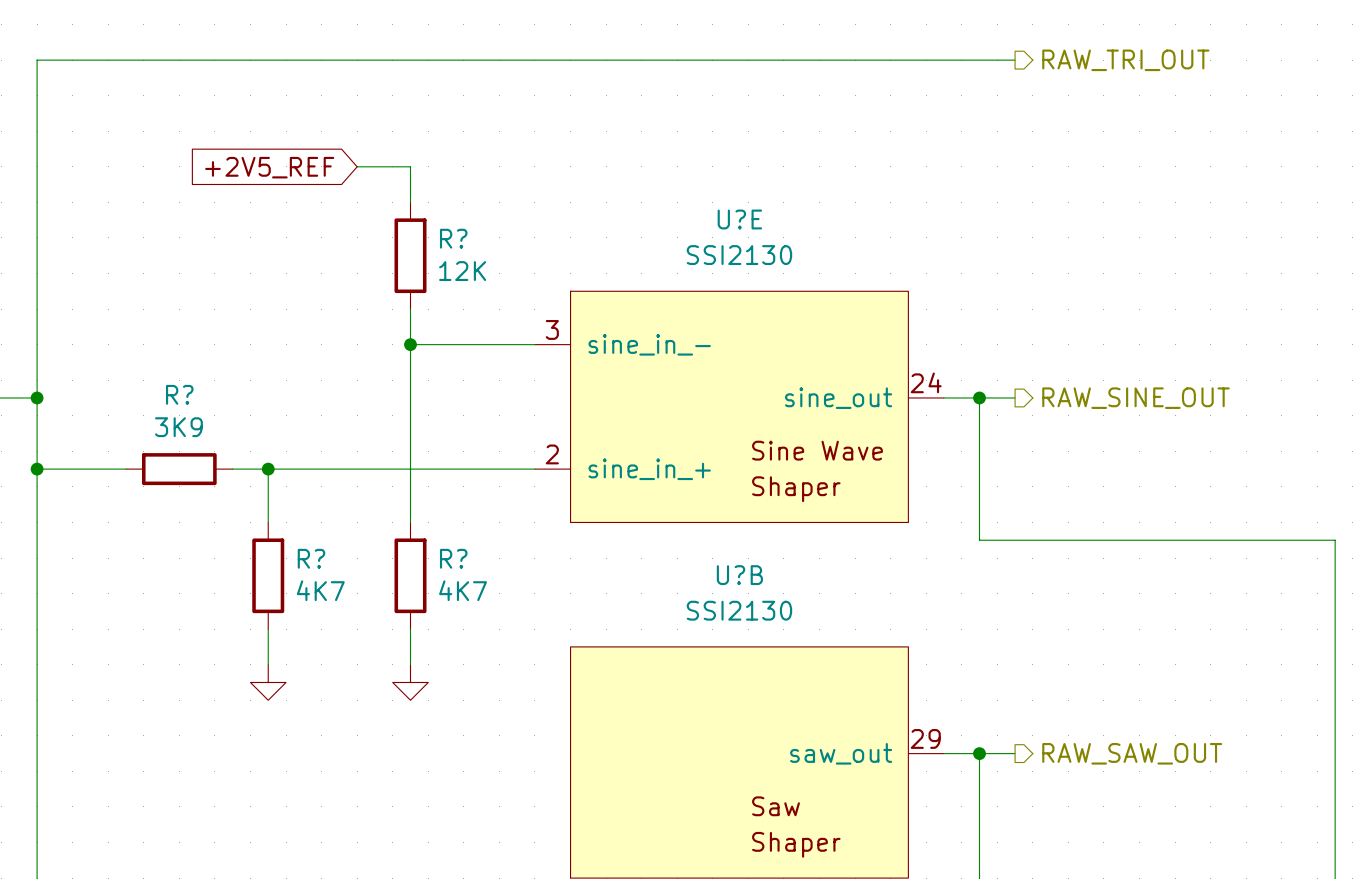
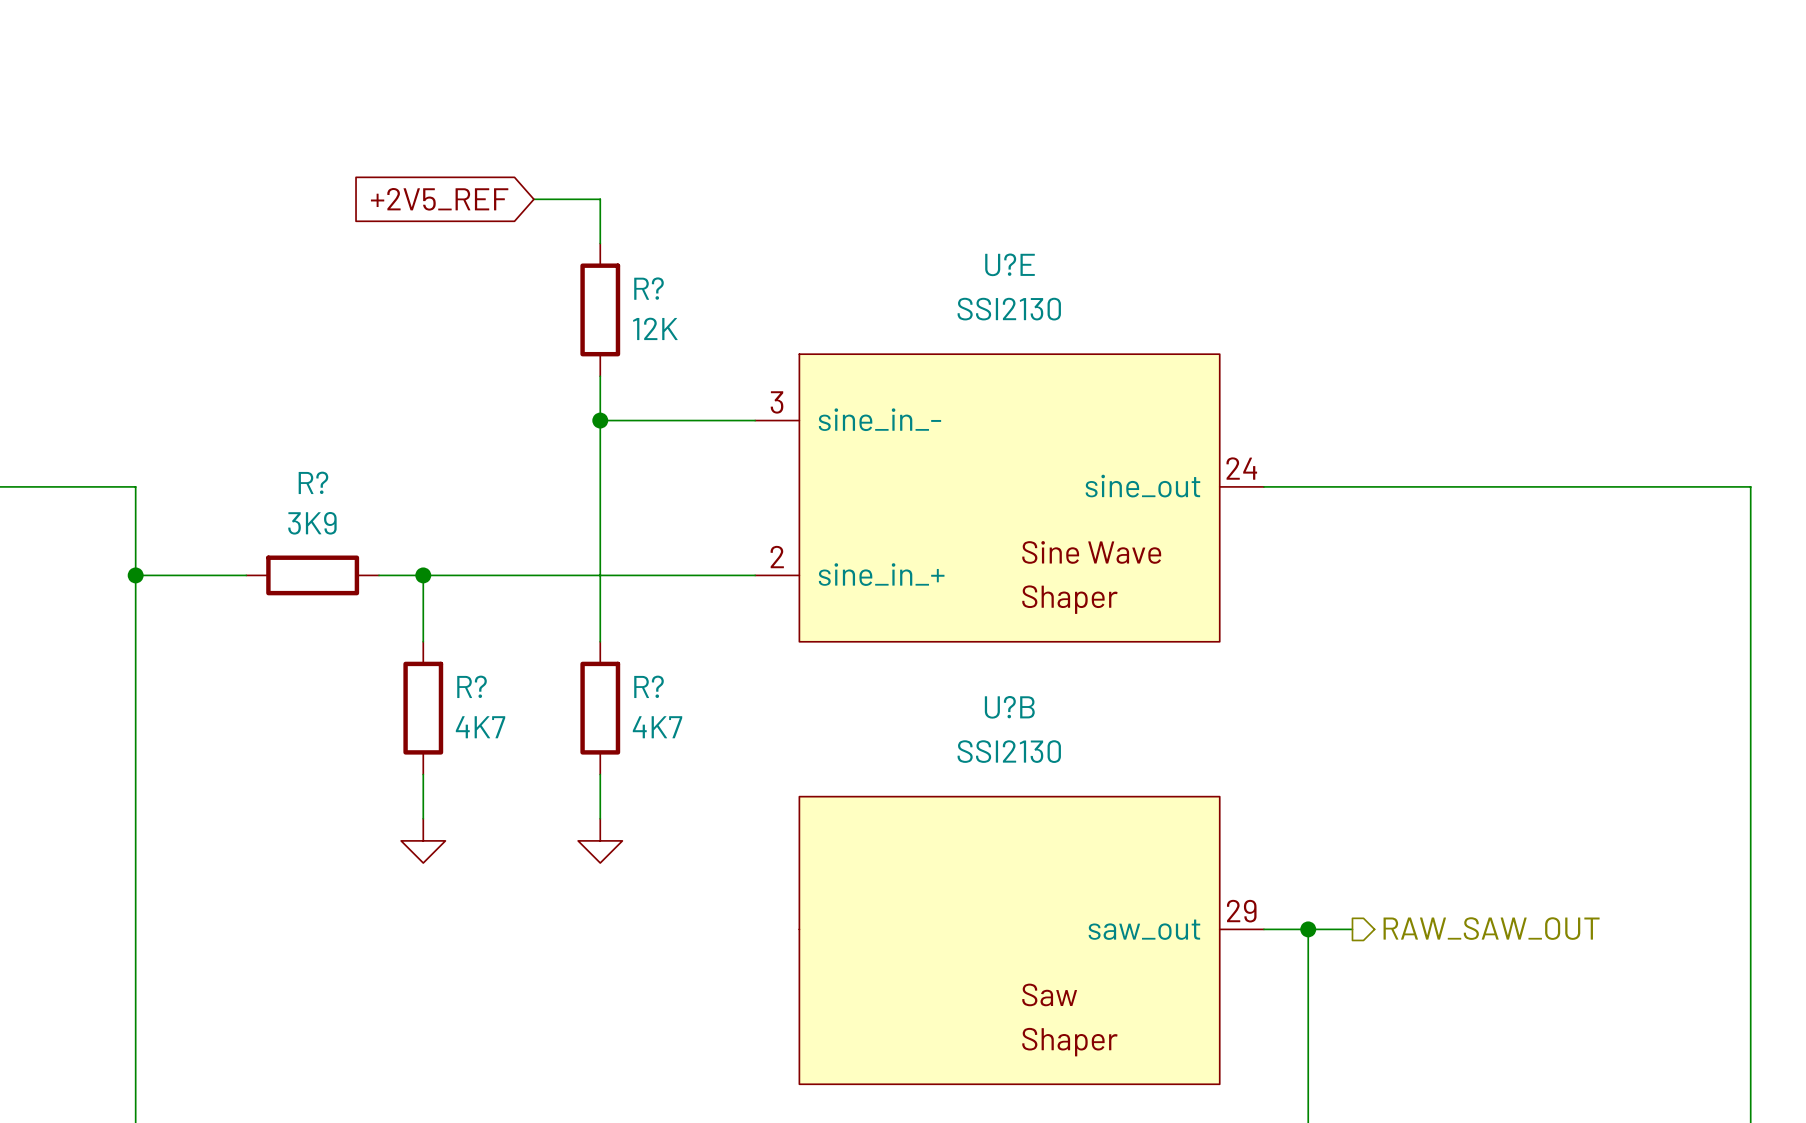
wire: (1015, 60) (37, 60) (37, 397) -> none
hierarchical label: RAW_TRI_OUT (1125, 60) -> none
junction: (37, 397) -> none
wire: (979, 397) (979, 540) (1335, 540) -> (1352, 486) (1750, 486) (1750, 663)
junction: (979, 397) -> none
hierarchical label: RAW_SINE_OUT (1136, 398) -> none

